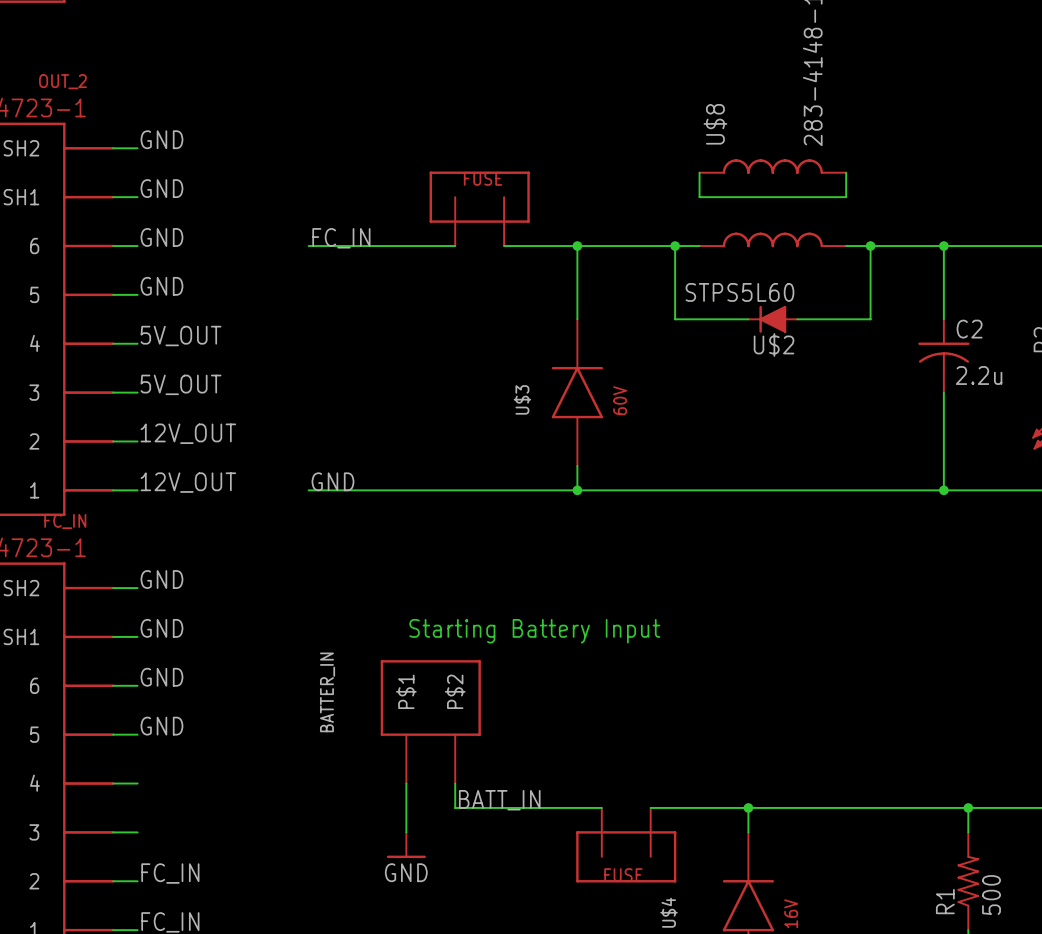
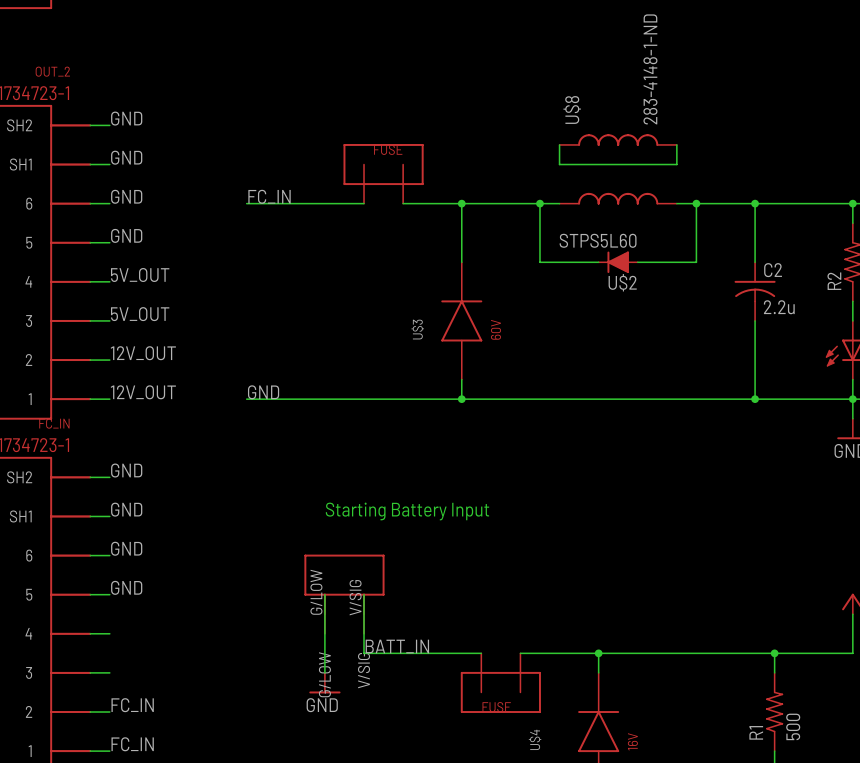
BATTER_IN: (430, 721) -> none
part: none -> (344, 594)

